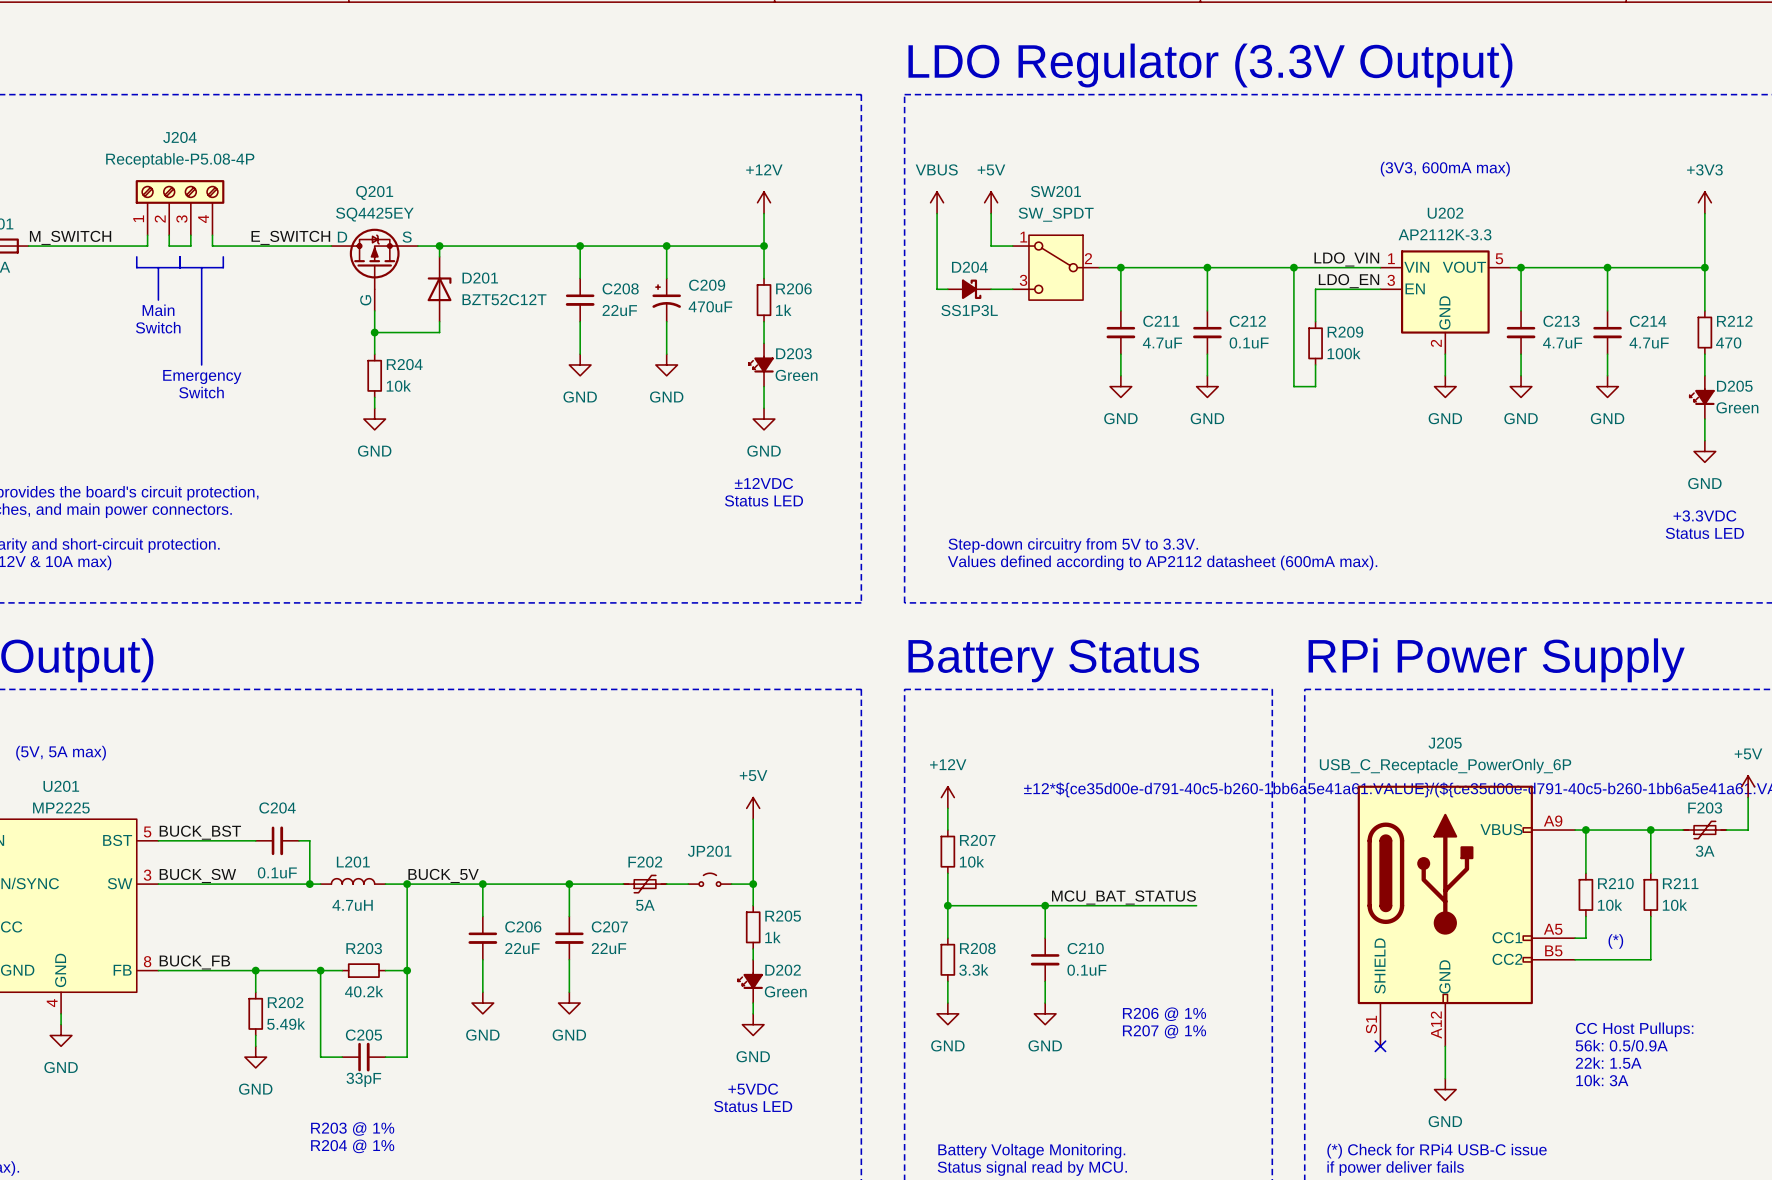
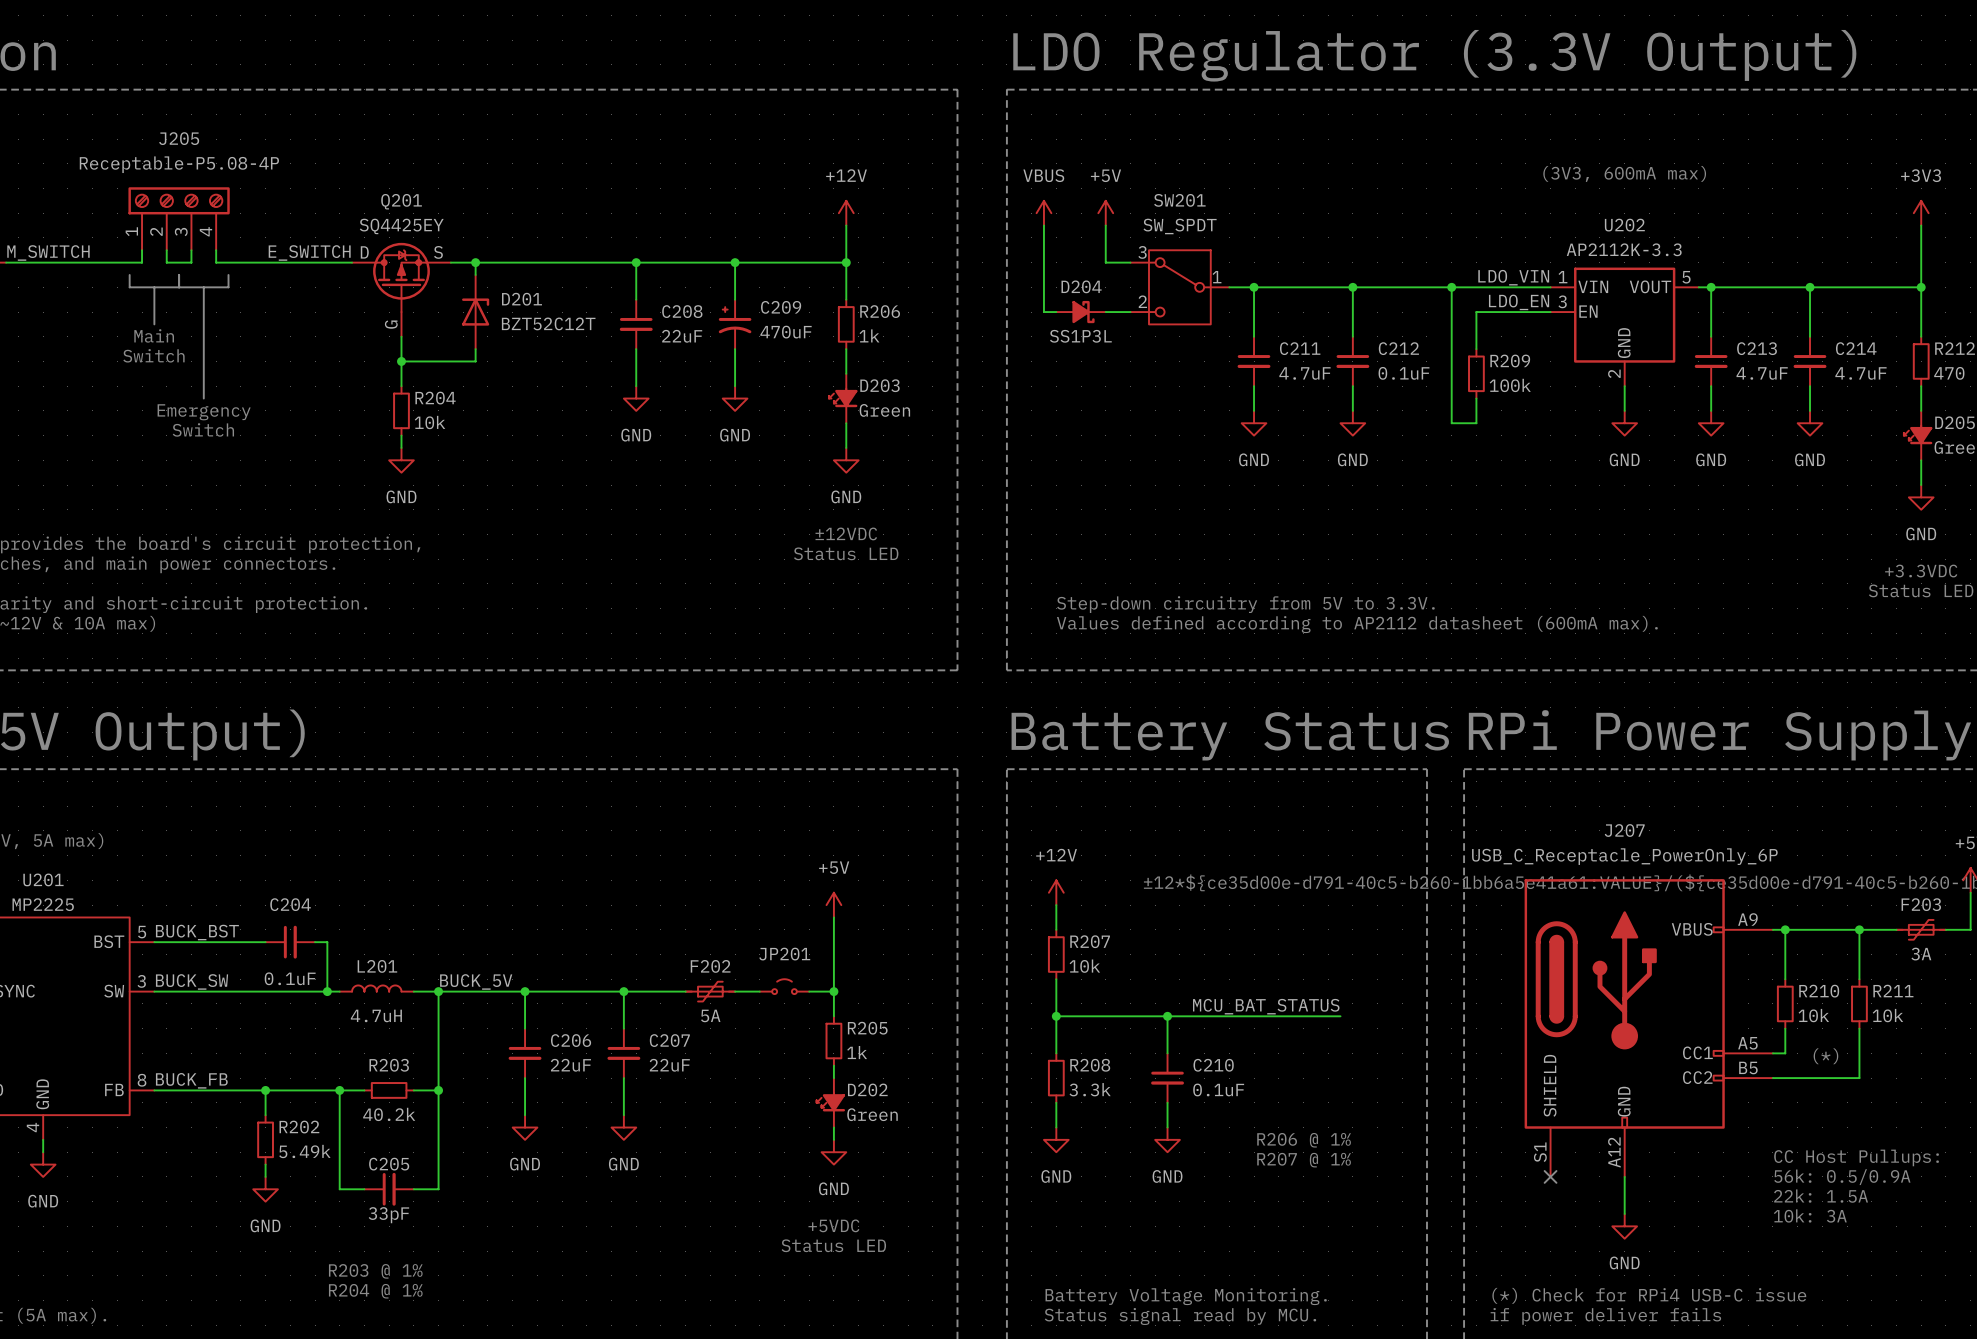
J204 name: J204 (179, 137) -> J205 (179, 138)
SW201 pin number: 1 (1023, 237) -> 3 (1142, 252)
SW201 pin number: 2 (1088, 258) -> 1 (1217, 277)
SW201 pin number: 3 (1023, 280) -> 2 (1142, 301)
J205 name: J205 (1445, 743) -> J207 (1624, 830)

